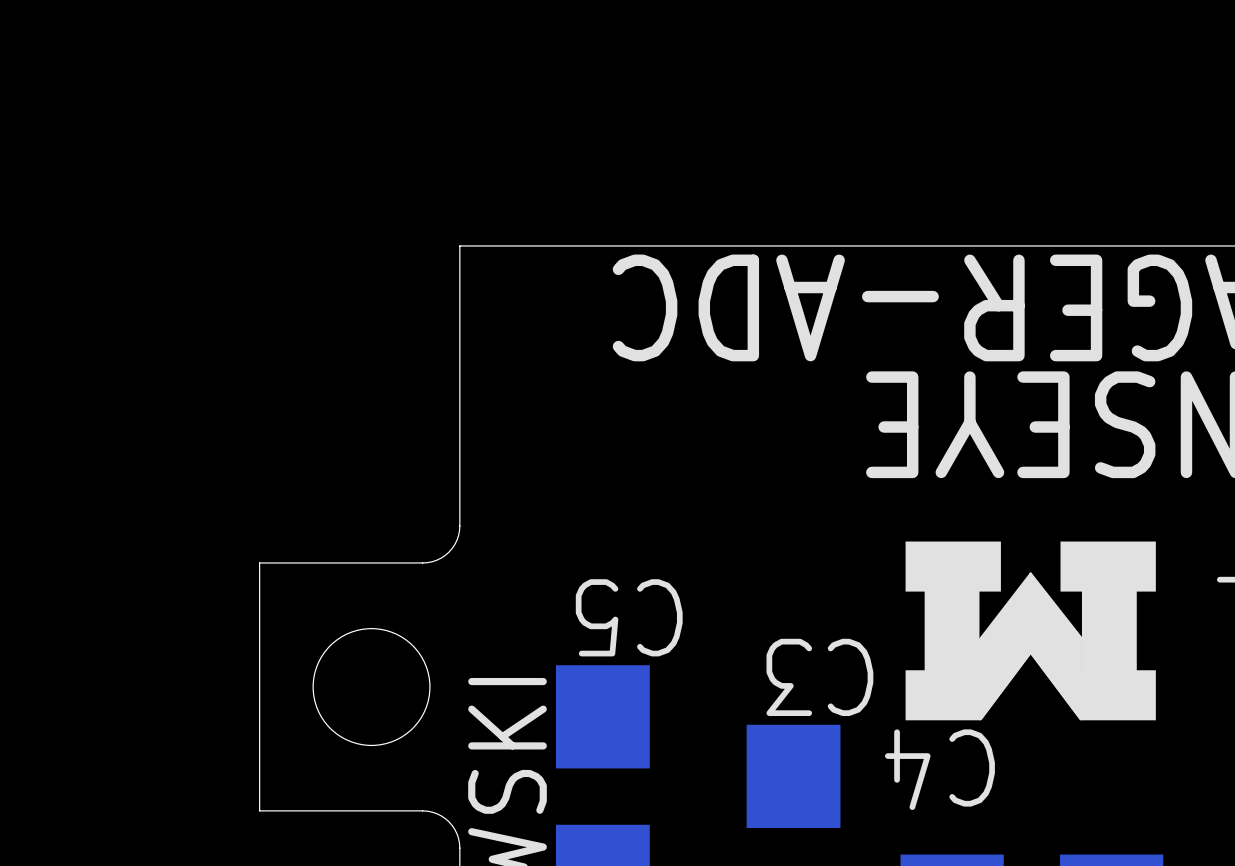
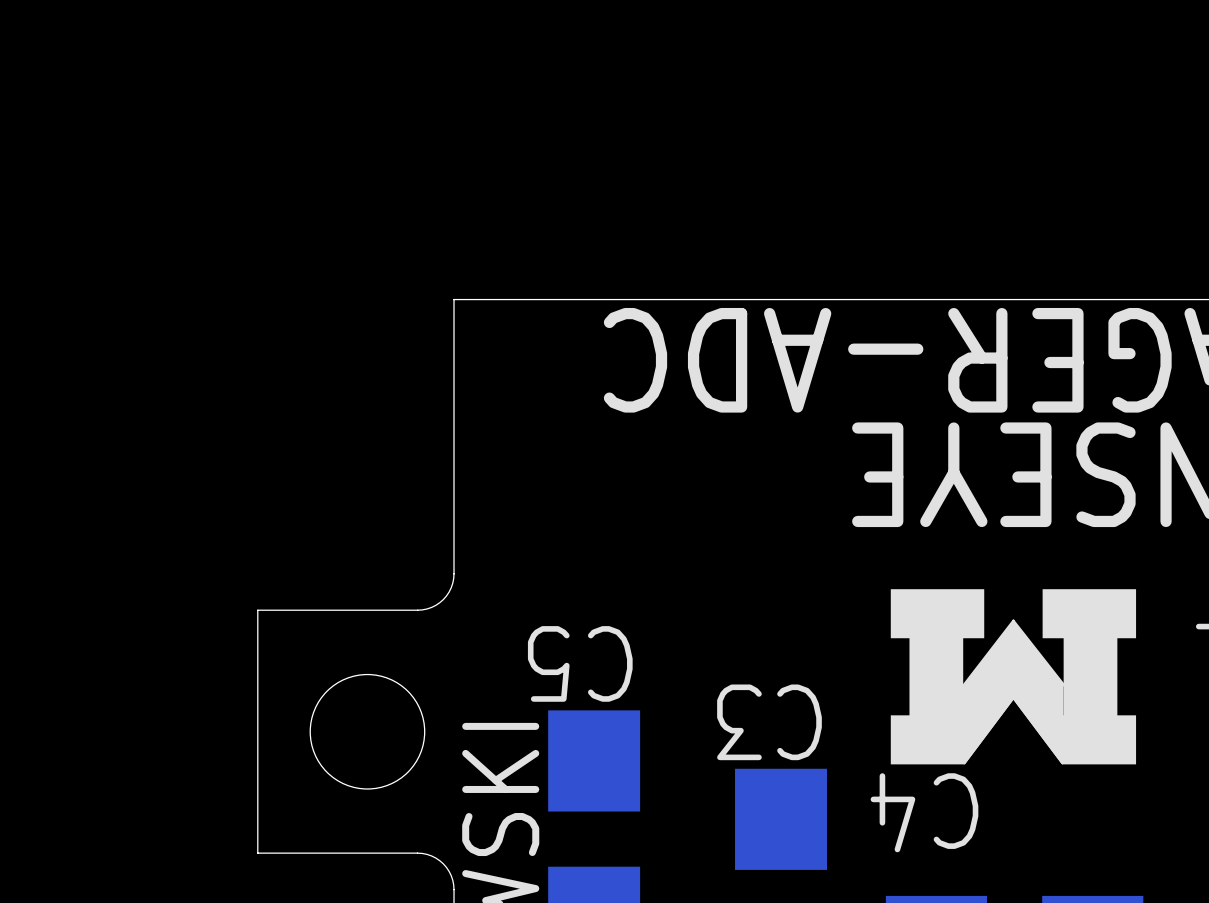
C5 name position: C5 (629, 617) -> C5 (580, 663)
C3 name position: C3 (819, 677) -> C3 (769, 722)

